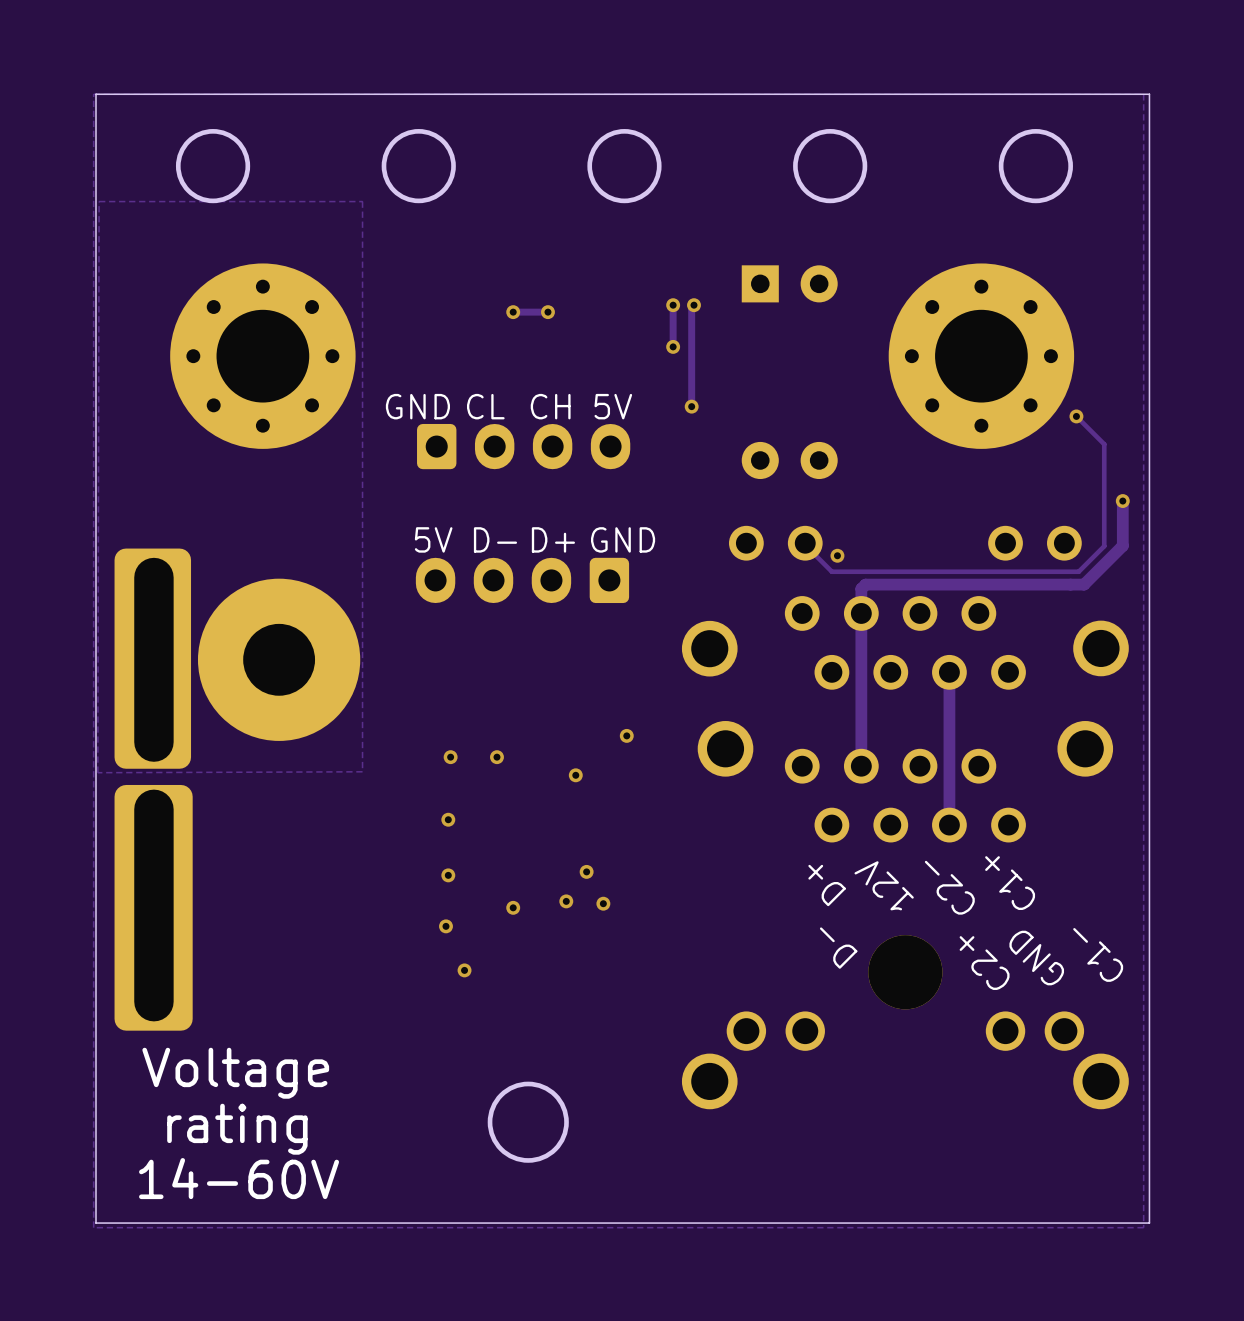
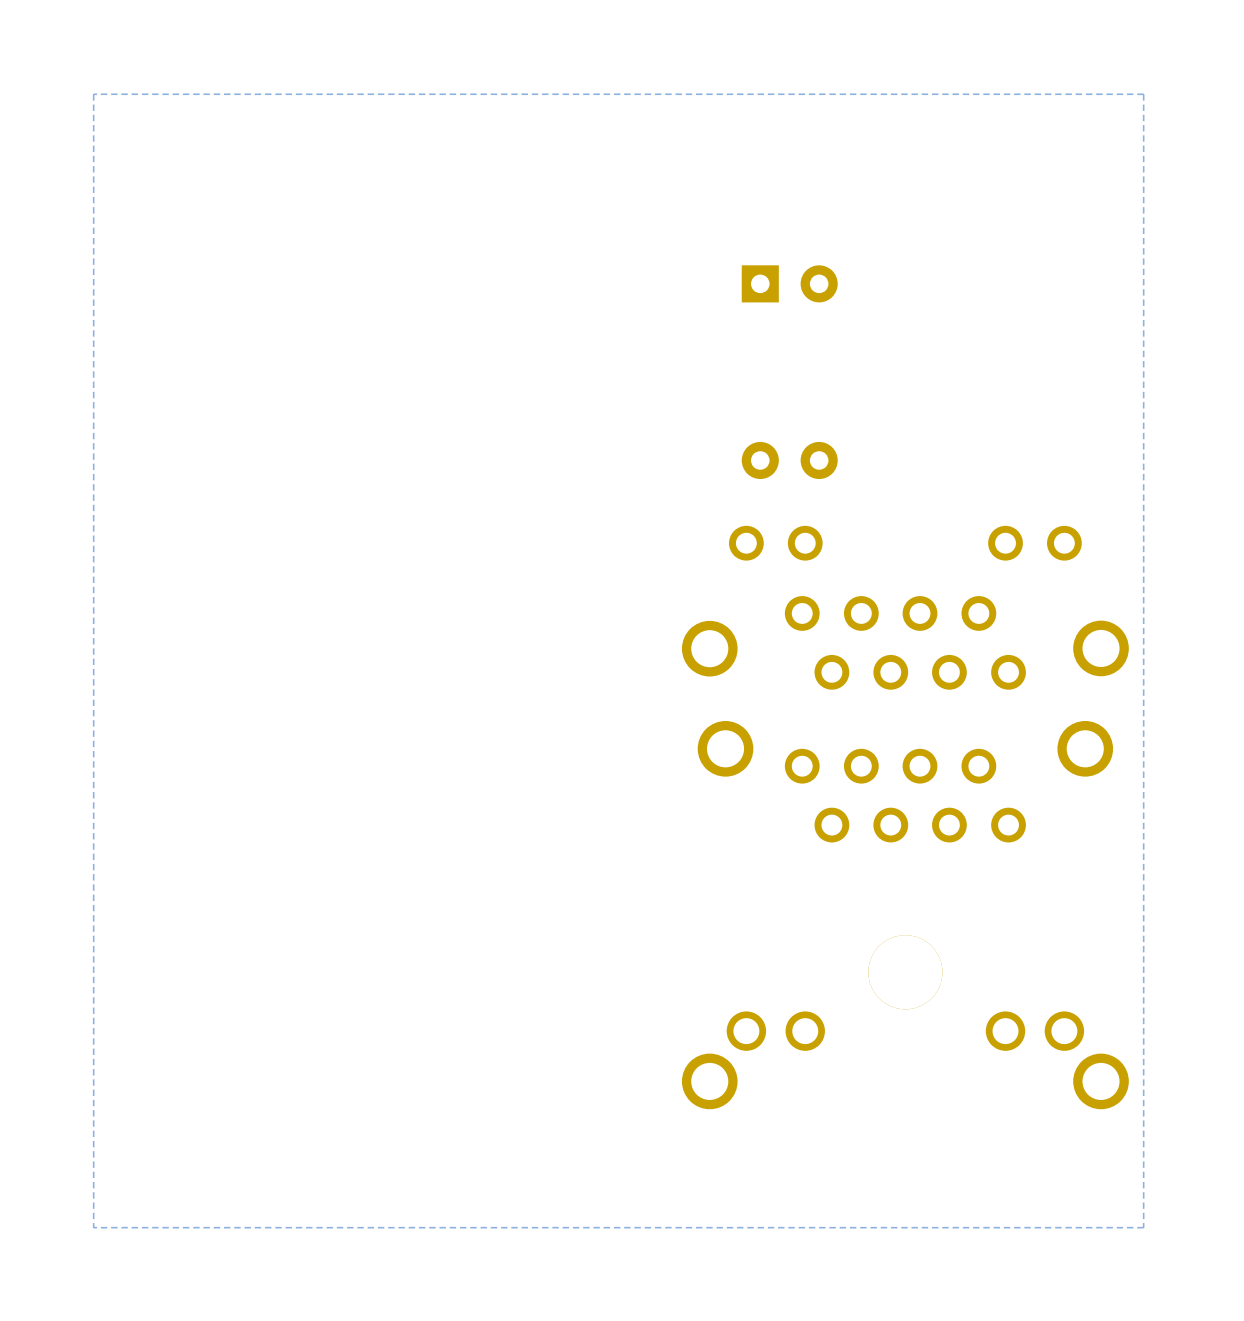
board edge: (1149, 94) (95, 94) (95, 1223) (1149, 1223) (1149, 94) -> none
round board edge: [175, 129, 251, 204] -> none
round board edge: [381, 129, 456, 204] -> none
round board edge: [587, 129, 662, 204] -> none
round board edge: [793, 129, 868, 204] -> none
round board edge: [998, 129, 1073, 204] -> none
zone outline: (362, 201) (99, 201) (97, 772) (362, 771) (362, 201) -> none
track: (673, 305) (673, 346) -> none
via: (673, 305) -> none
track: (694, 305) (691, 307) (691, 406) -> none
via: (694, 305) -> none
via: (513, 312) -> none
track: (547, 312) (513, 312) -> none
via: (547, 312) -> none
via: (673, 346) -> none
part: (262, 356) -> none
part: (981, 356) -> none
text: GND (417, 406) -> none
text: CL (485, 406) -> none
text: CH (550, 406) -> none
text: 5V (613, 406) -> none
via: (691, 406) -> none
track: (1076, 416) (1104, 444) (1104, 546) (1078, 571) (831, 571) (805, 543) -> none
via: (1076, 416) -> none
part: (523, 446) -> none
track: (1122, 501) (1122, 545) (1084, 584) (865, 584) (861, 588) (861, 766) -> none
via: (1122, 501) -> none
text: 5V (433, 539) -> none
text: D- (495, 539) -> none
text: D+ (553, 539) -> none
text: GND (623, 539) -> none
via: (837, 555) -> none
part: (522, 580) -> none
track: (949, 672) (949, 825) -> none
via: (626, 735) -> none
via: (450, 757) -> none
via: (496, 757) -> none
via: (575, 775) -> none
part: (237, 789) -> none
via: (448, 819) -> none
via: (586, 871) -> none
via: (448, 875) -> none
text: C1+ (1010, 883) -> none
text: D+ (827, 885) -> none
text: 12V (884, 885) -> none
text: C2- (949, 887) -> none
via: (566, 901) -> none
via: (603, 903) -> none
via: (513, 907) -> none
via: (445, 926) -> none
text: D- (838, 948) -> none
text: C1- (1098, 954) -> none
text: GND (1036, 958) -> none
text: C2+ (984, 963) -> none
via: (464, 970) -> none
text: Voltage (235, 1073) -> none
round board edge: [487, 1081, 569, 1163] -> none
text: rating (237, 1129) -> none
text: 14-60V (239, 1178) -> none

